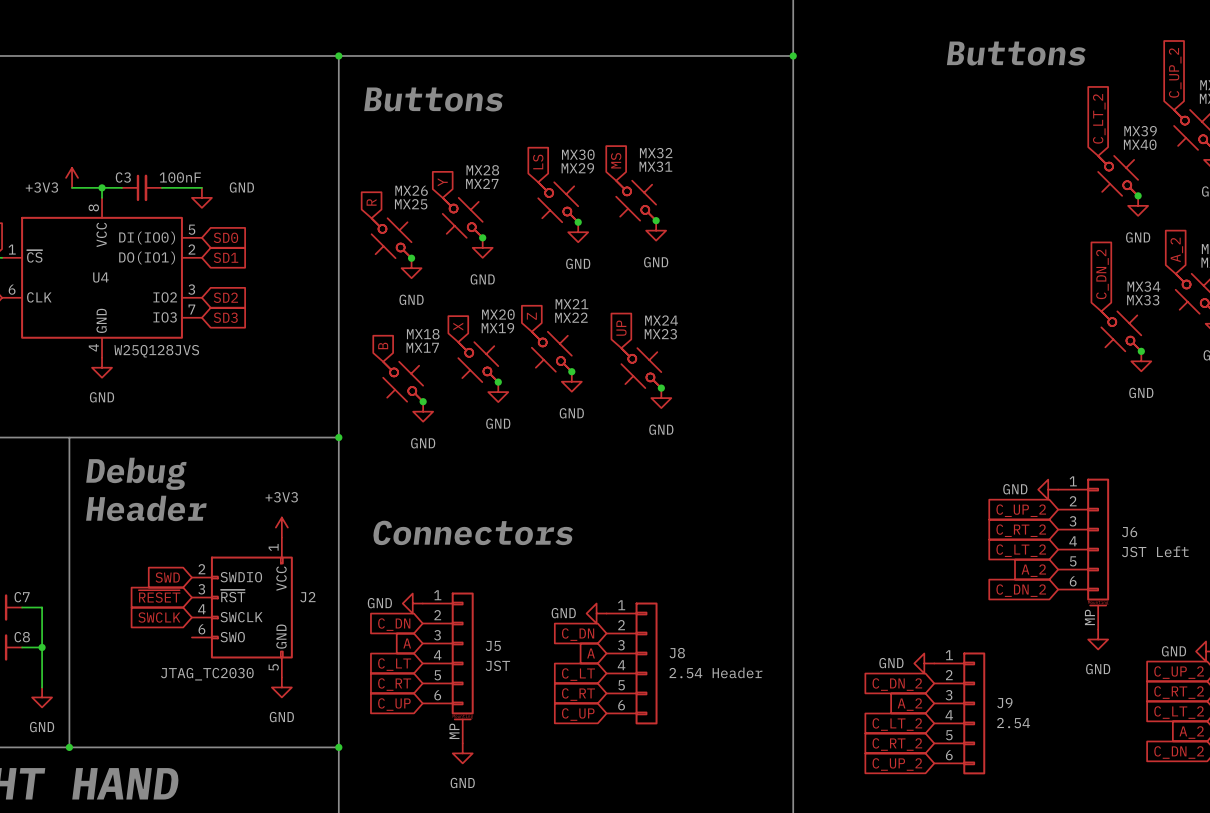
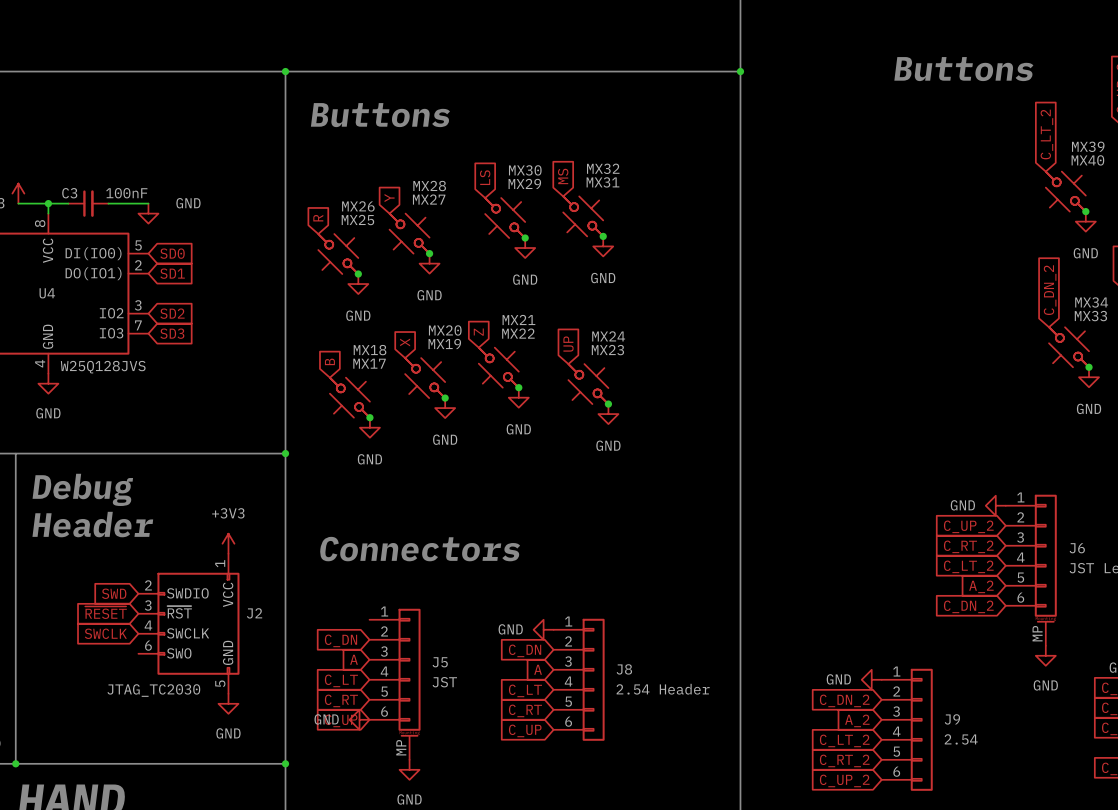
power symbol position: GND (412, 603) -> GND (359, 719)

